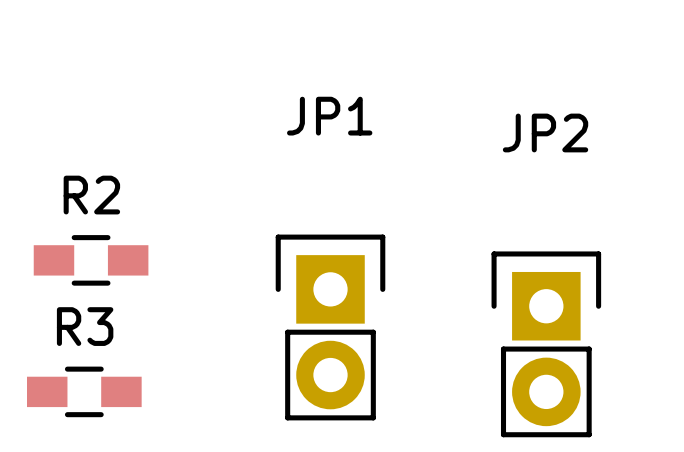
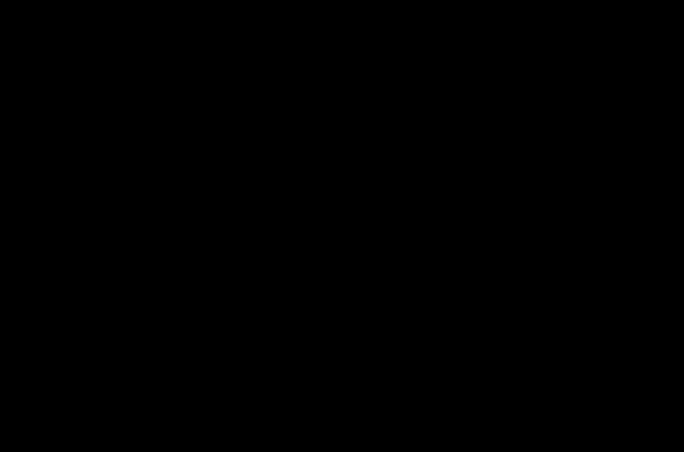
R2: (91, 260) -> none
JP1: (330, 327) -> none
JP2: (546, 344) -> none
R3: (84, 391) -> none

